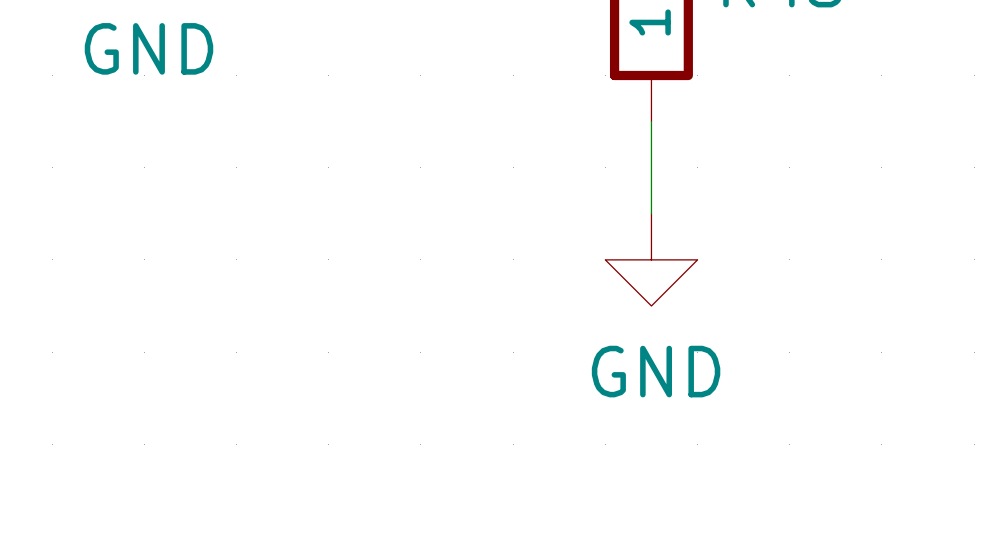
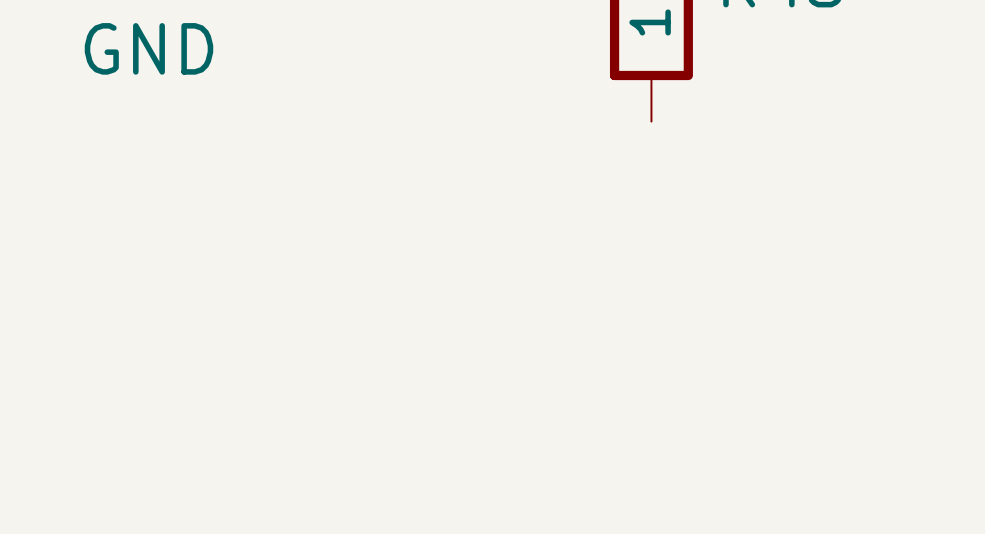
wire: (651, 121) (651, 213) -> none
power symbol: GND (651, 259) -> none

